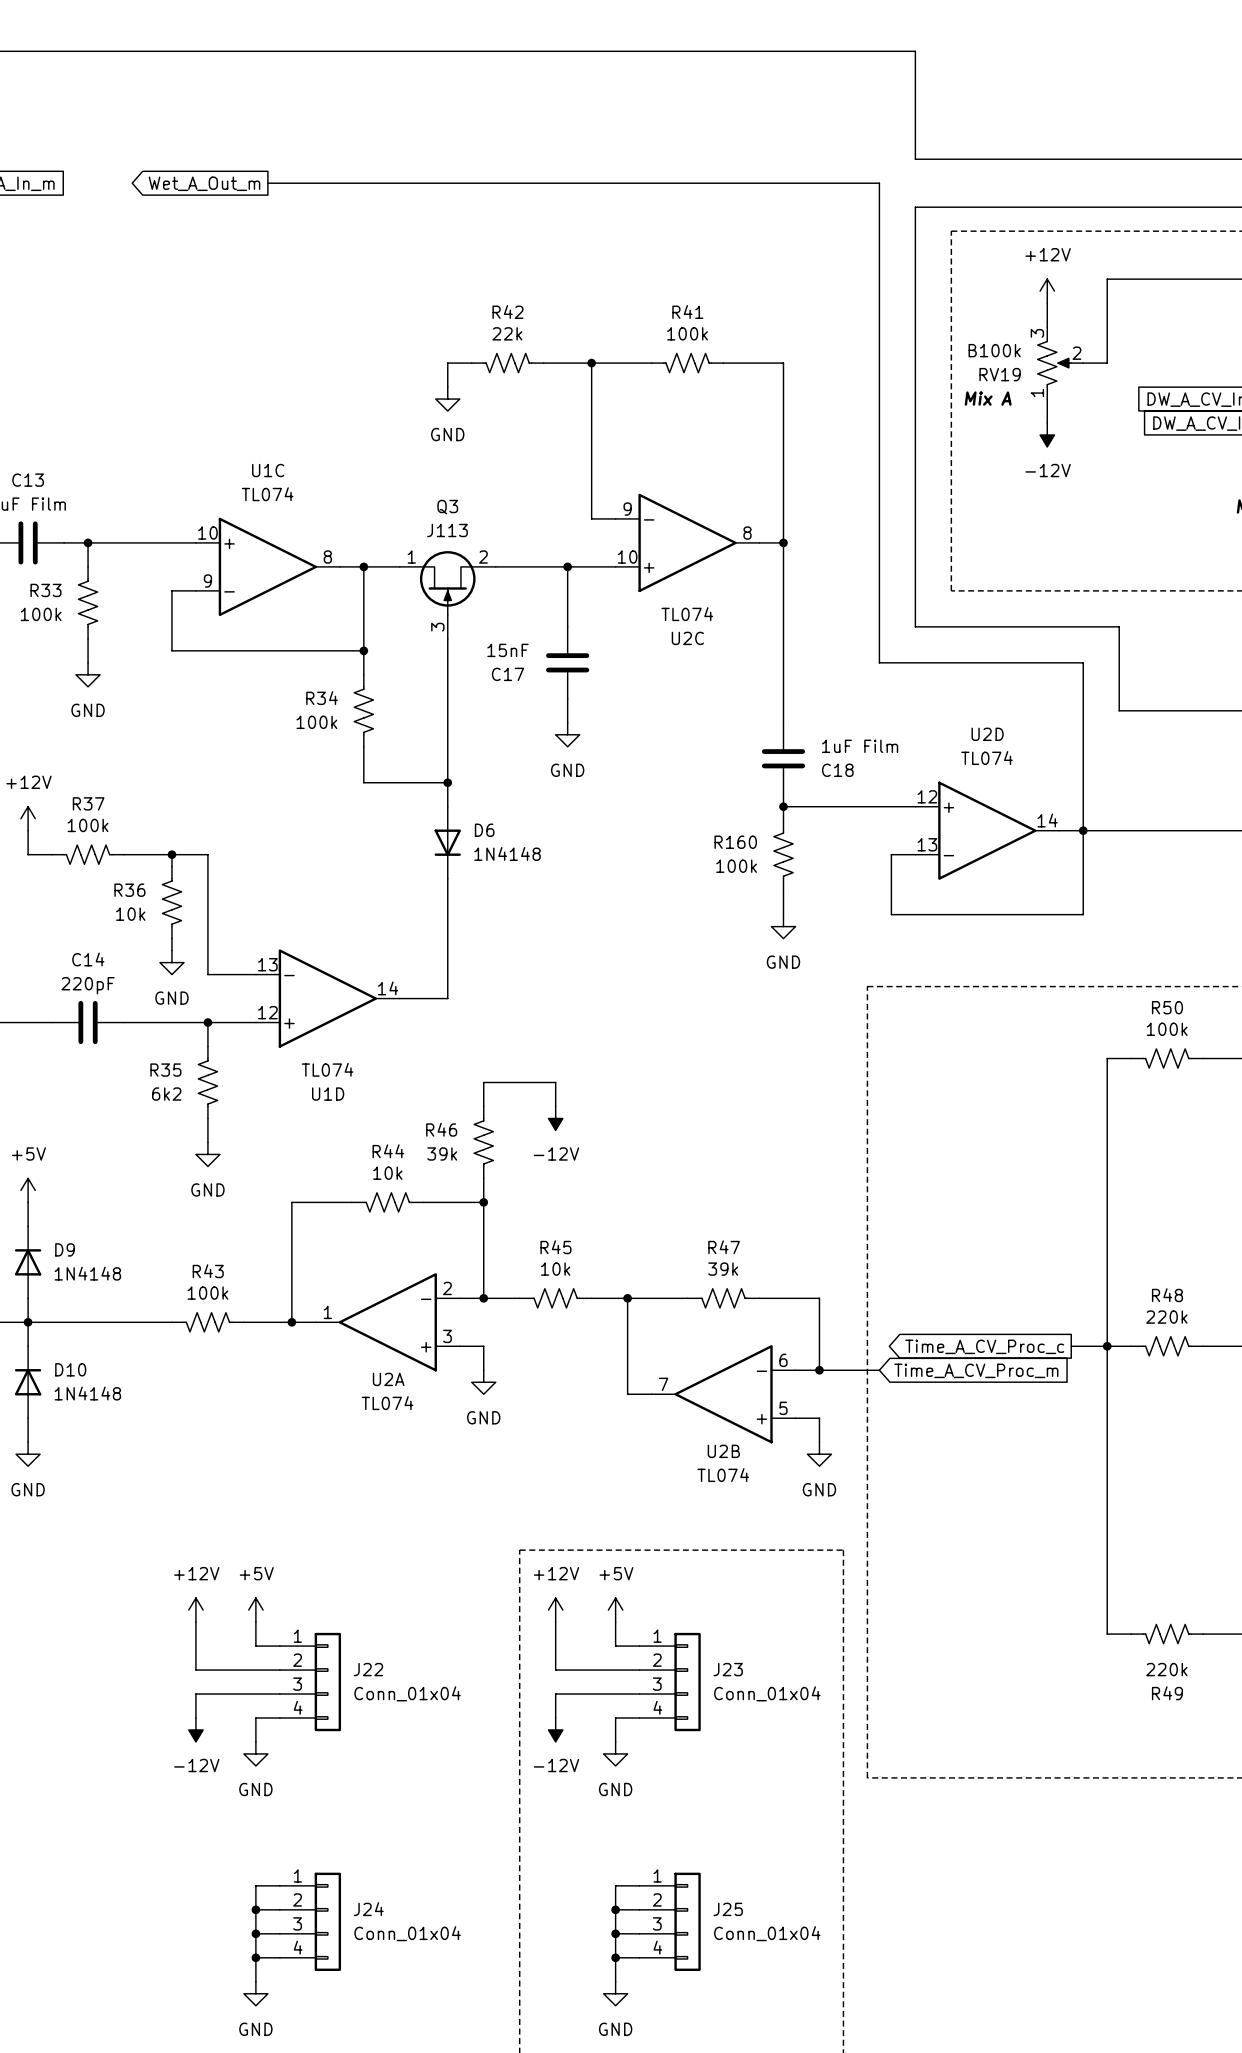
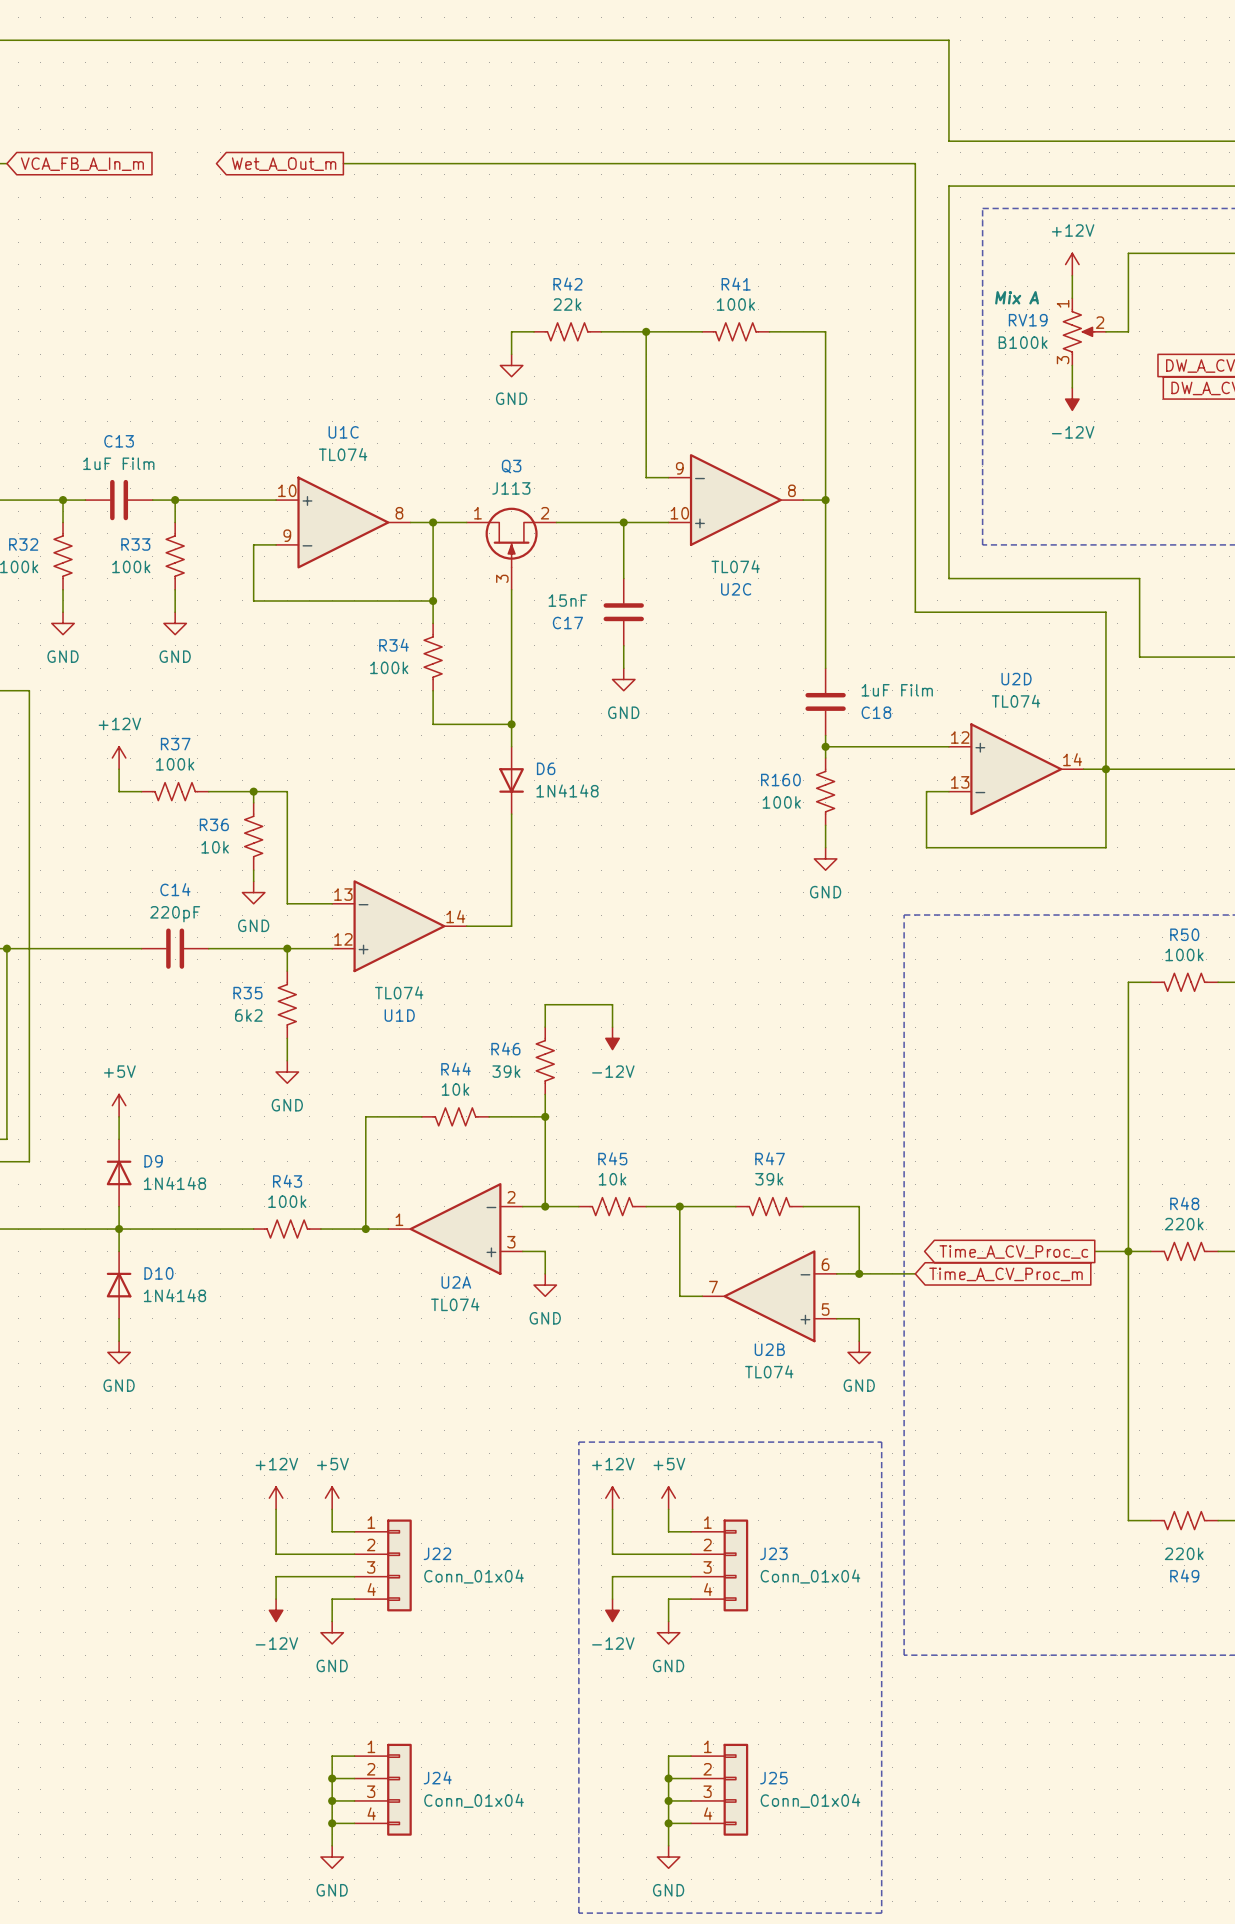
RV19 flip: as is (1054, 363) -> up-down (1079, 331)

